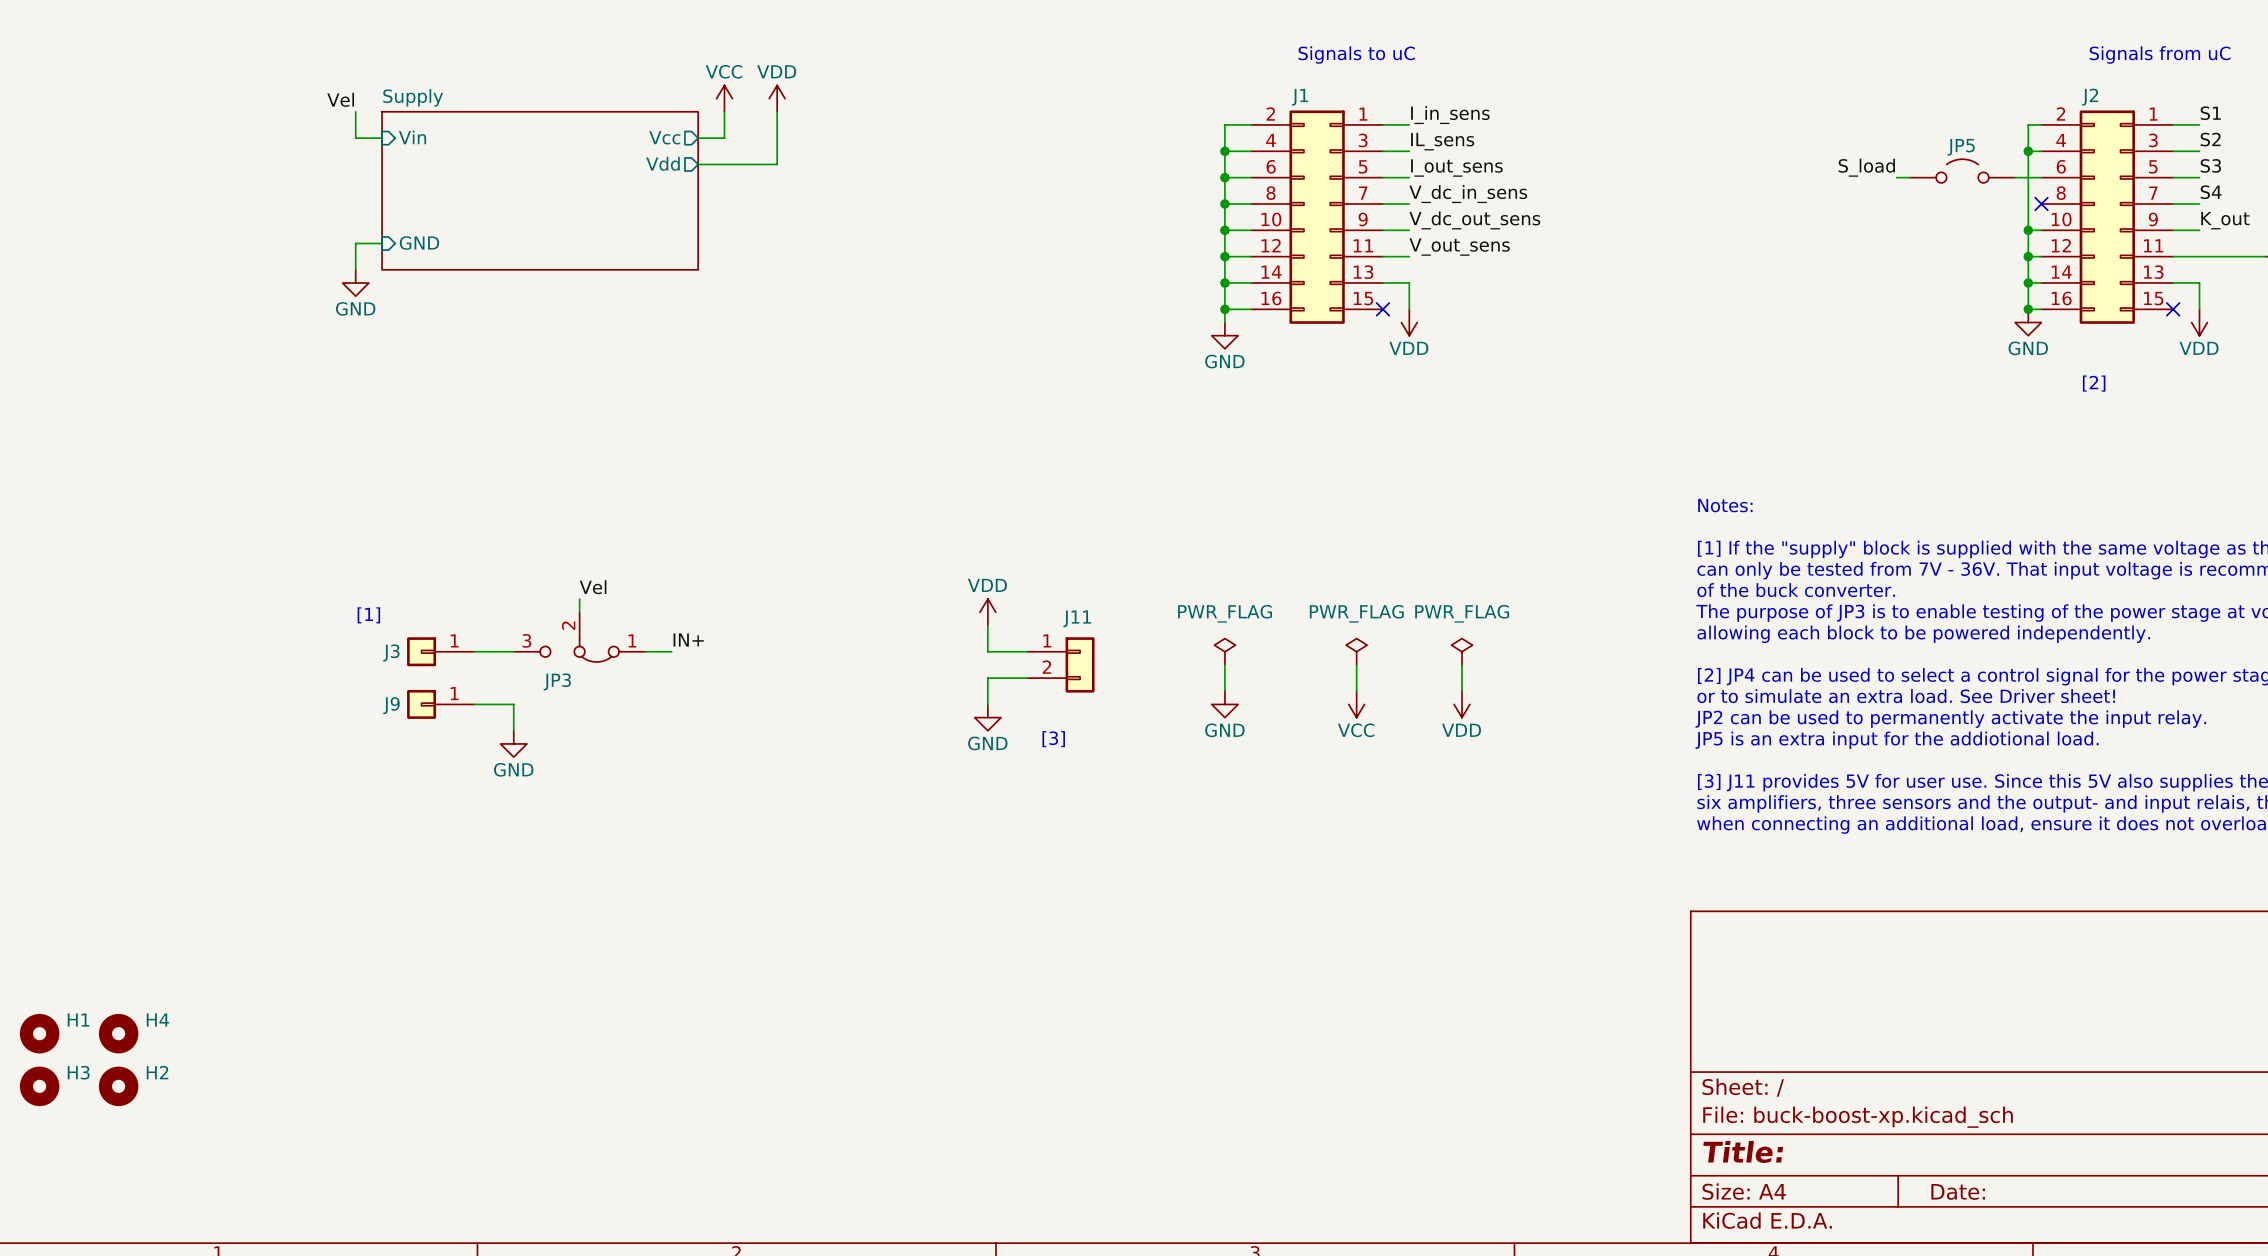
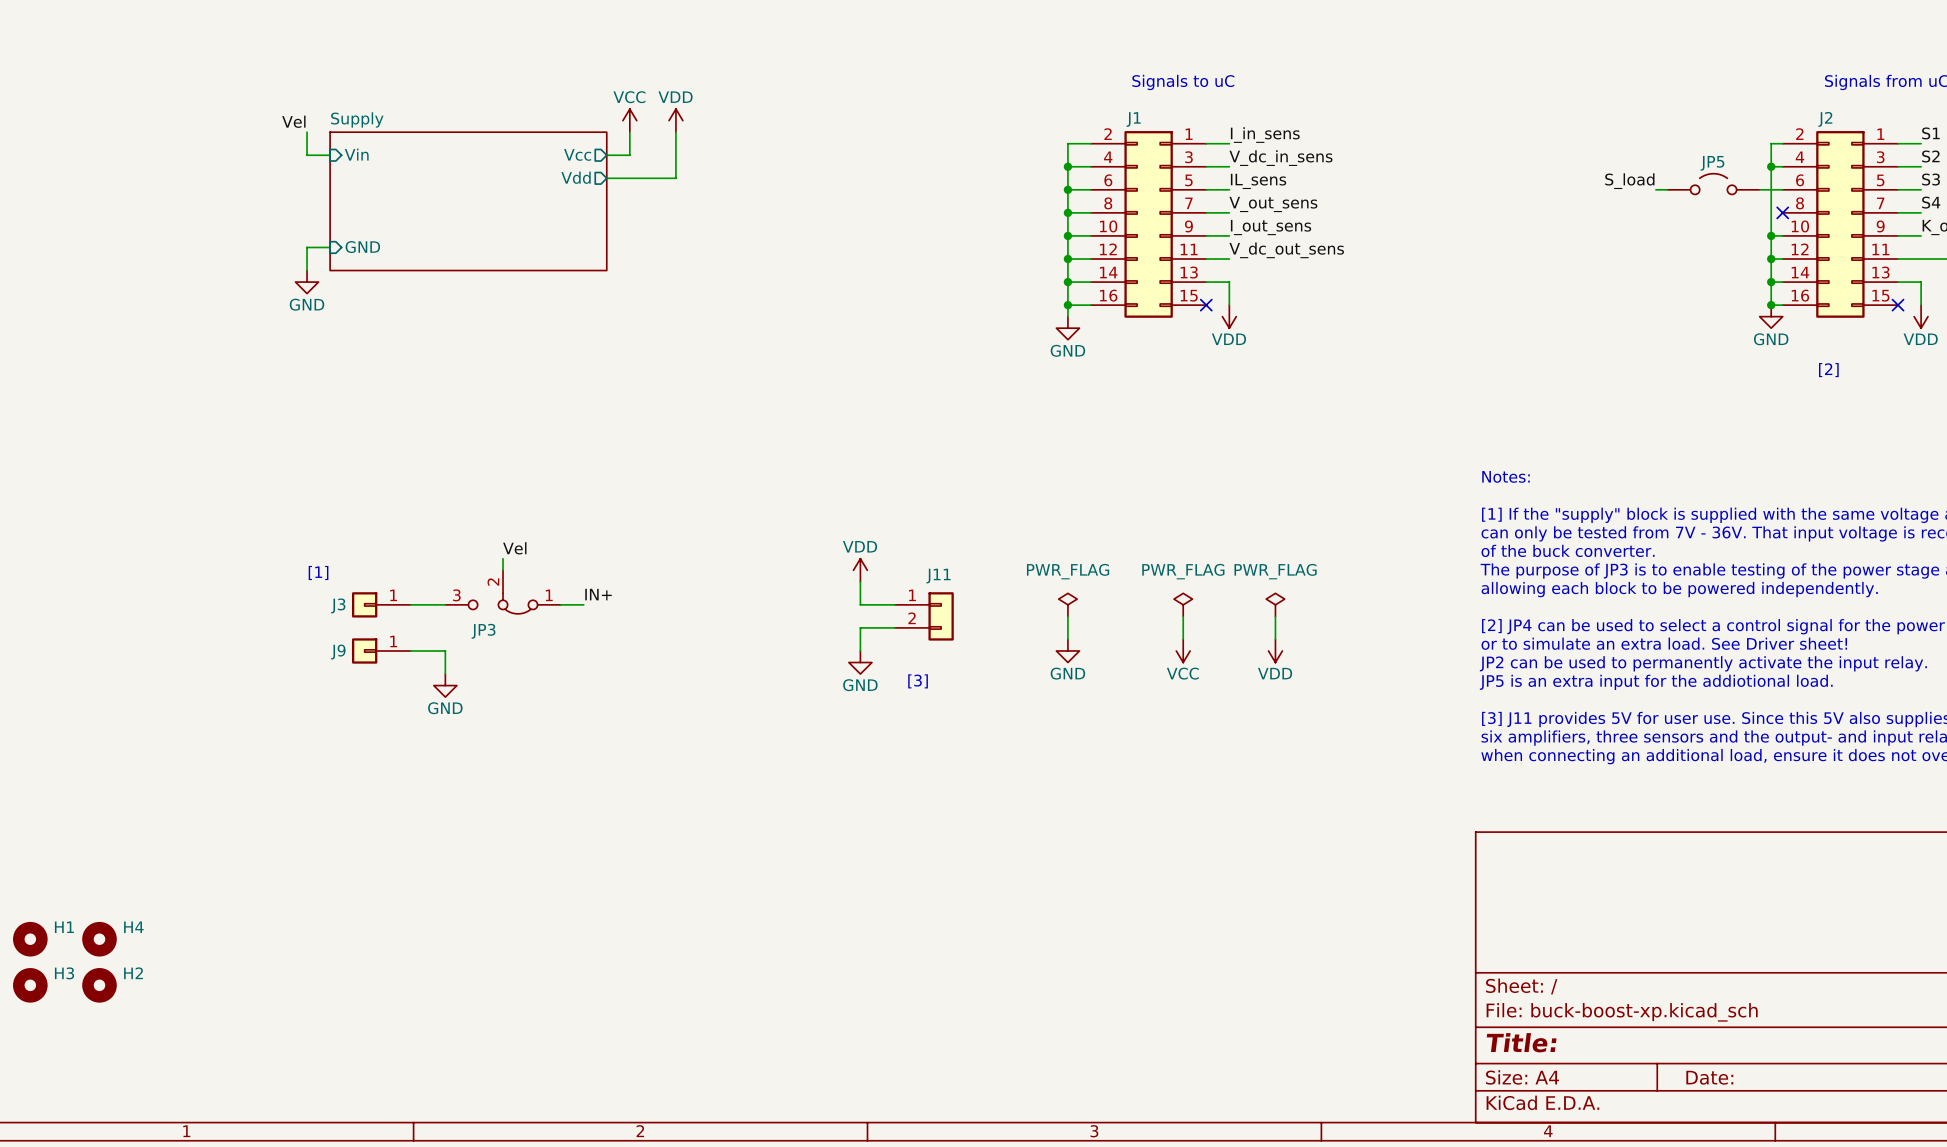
label: IL_sens (1442, 141) -> V_dc_in_sens (1280, 158)
label: I_out_sens (1456, 168) -> IL_sens (1258, 181)
label: V_dc_in_sens (1468, 194) -> V_out_sens (1273, 204)
label: V_dc_out_sens (1474, 220) -> I_out_sens (1271, 227)
label: V_out_sens (1459, 247) -> V_dc_out_sens (1286, 250)

